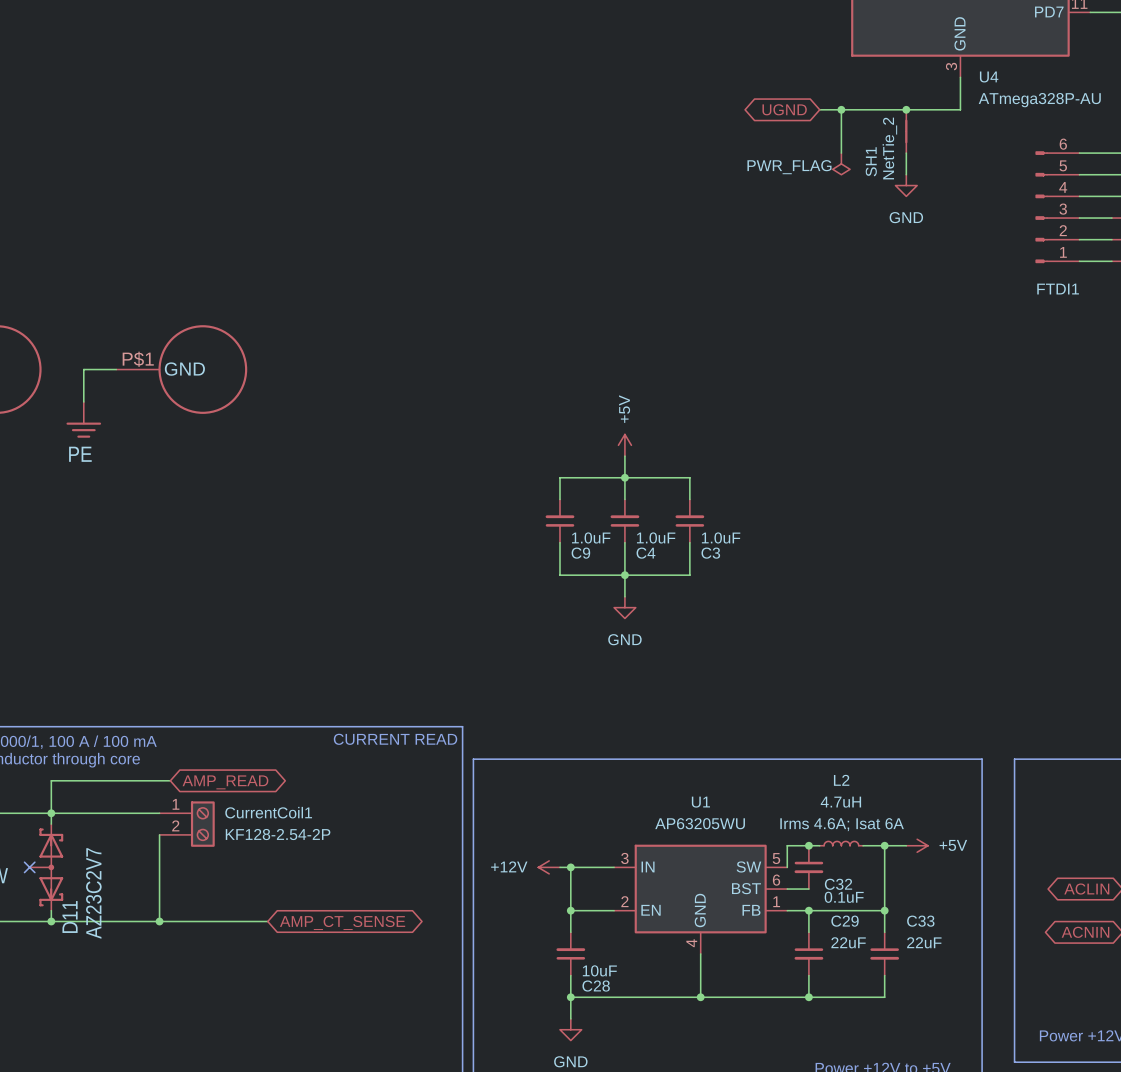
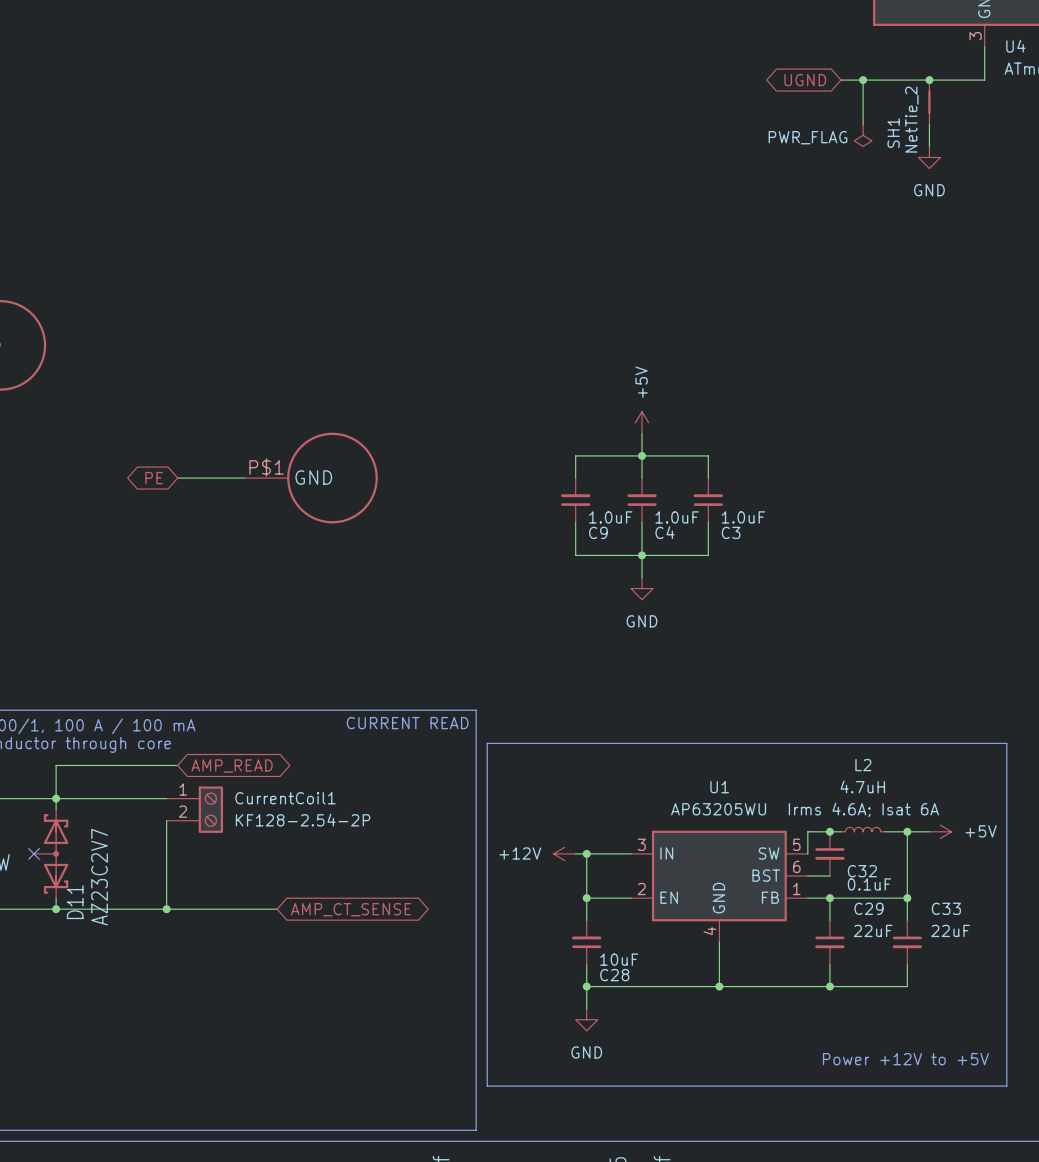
wire: (116, 369) (83, 369) (83, 402) -> none
part position: (181, 369) -> (310, 478)
power symbol: PE (83, 419) -> none
global label: none -> PE (154, 478)
wire: none -> (177, 478) (244, 478)

